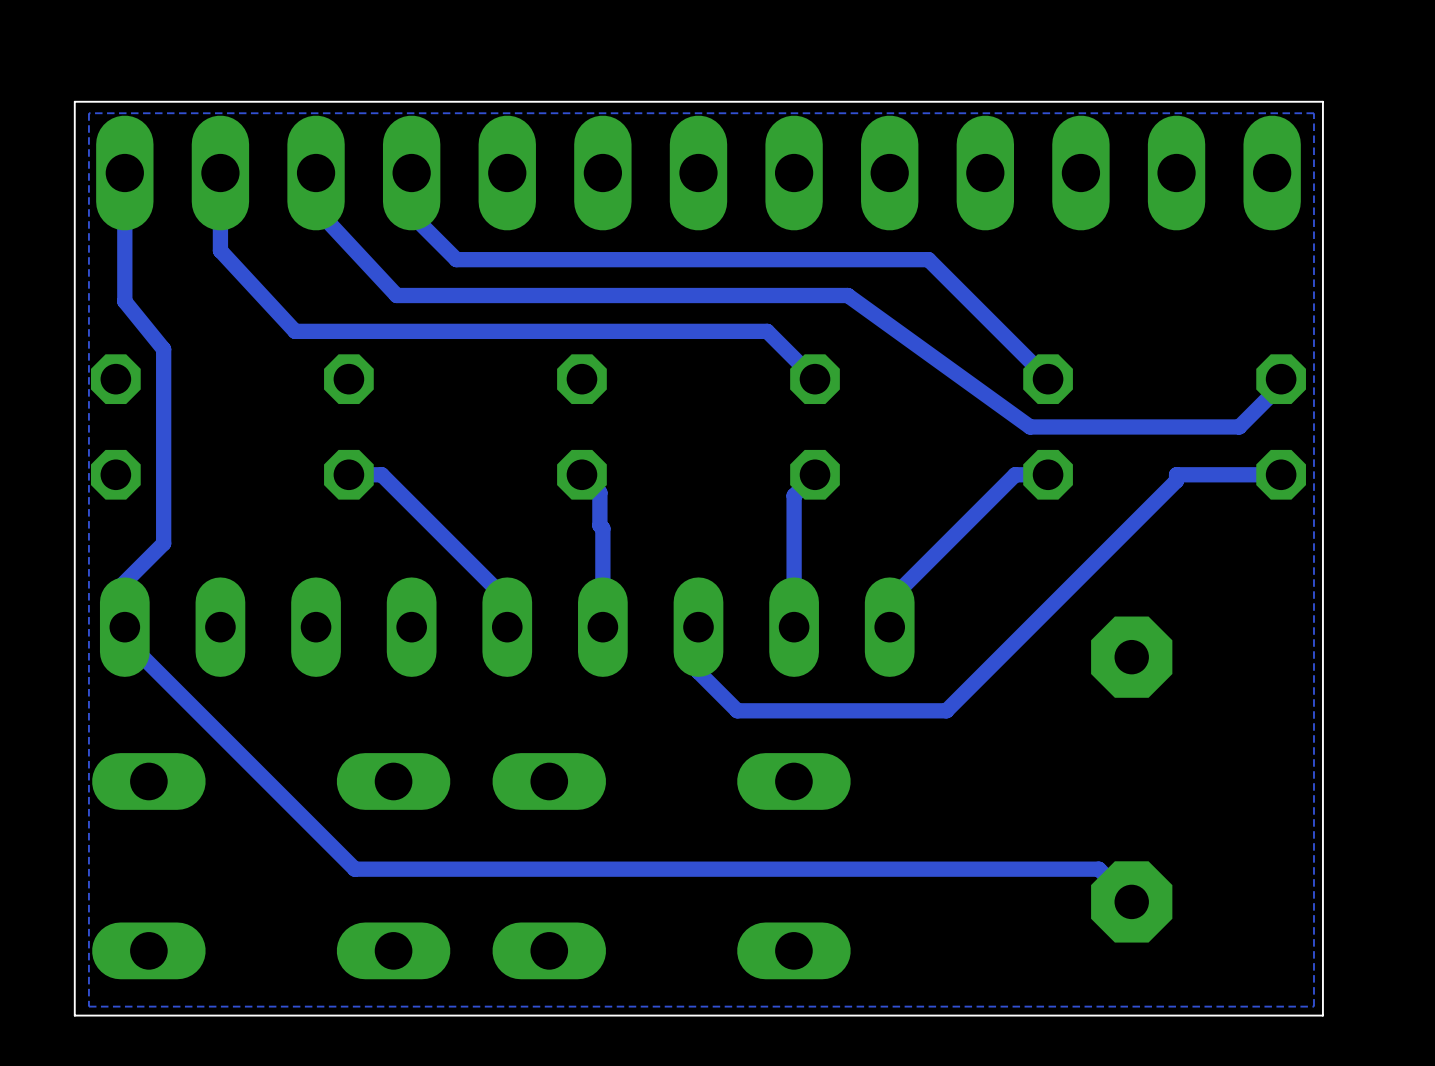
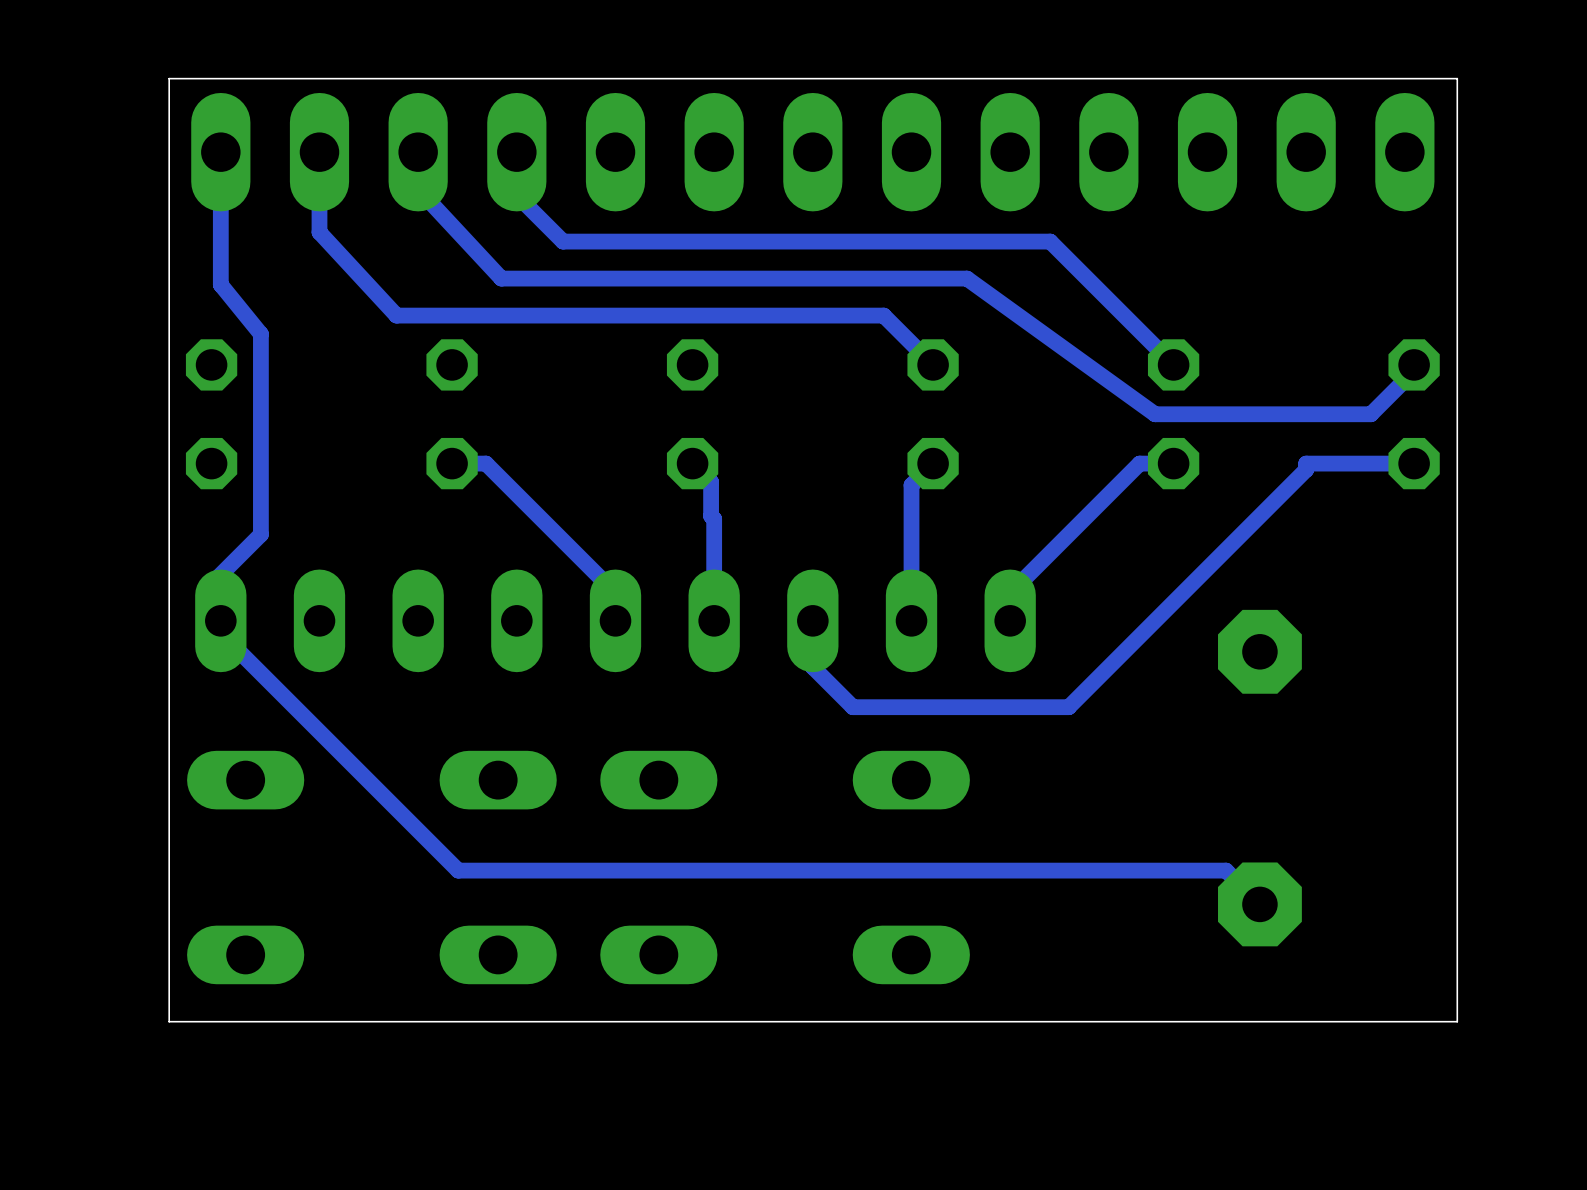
zone outline: (1313, 113) (88, 113) (88, 1006) (1313, 1006) (1313, 113) -> none

